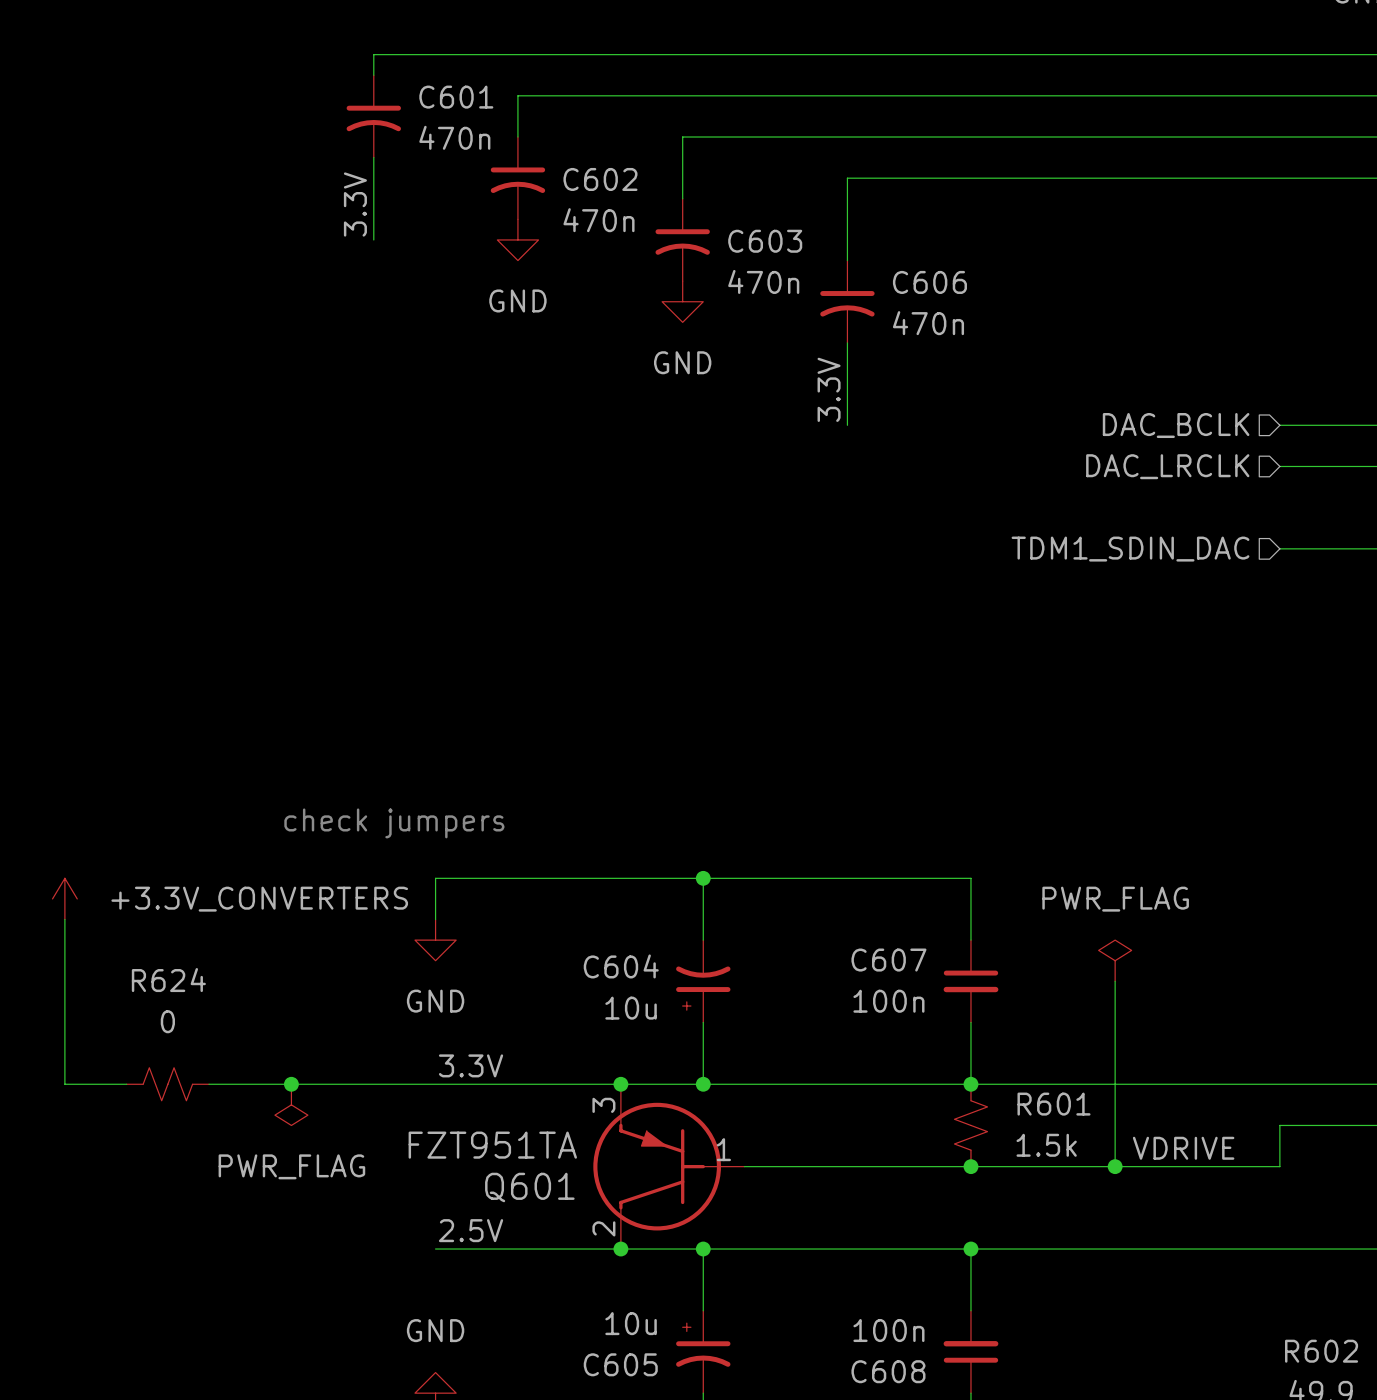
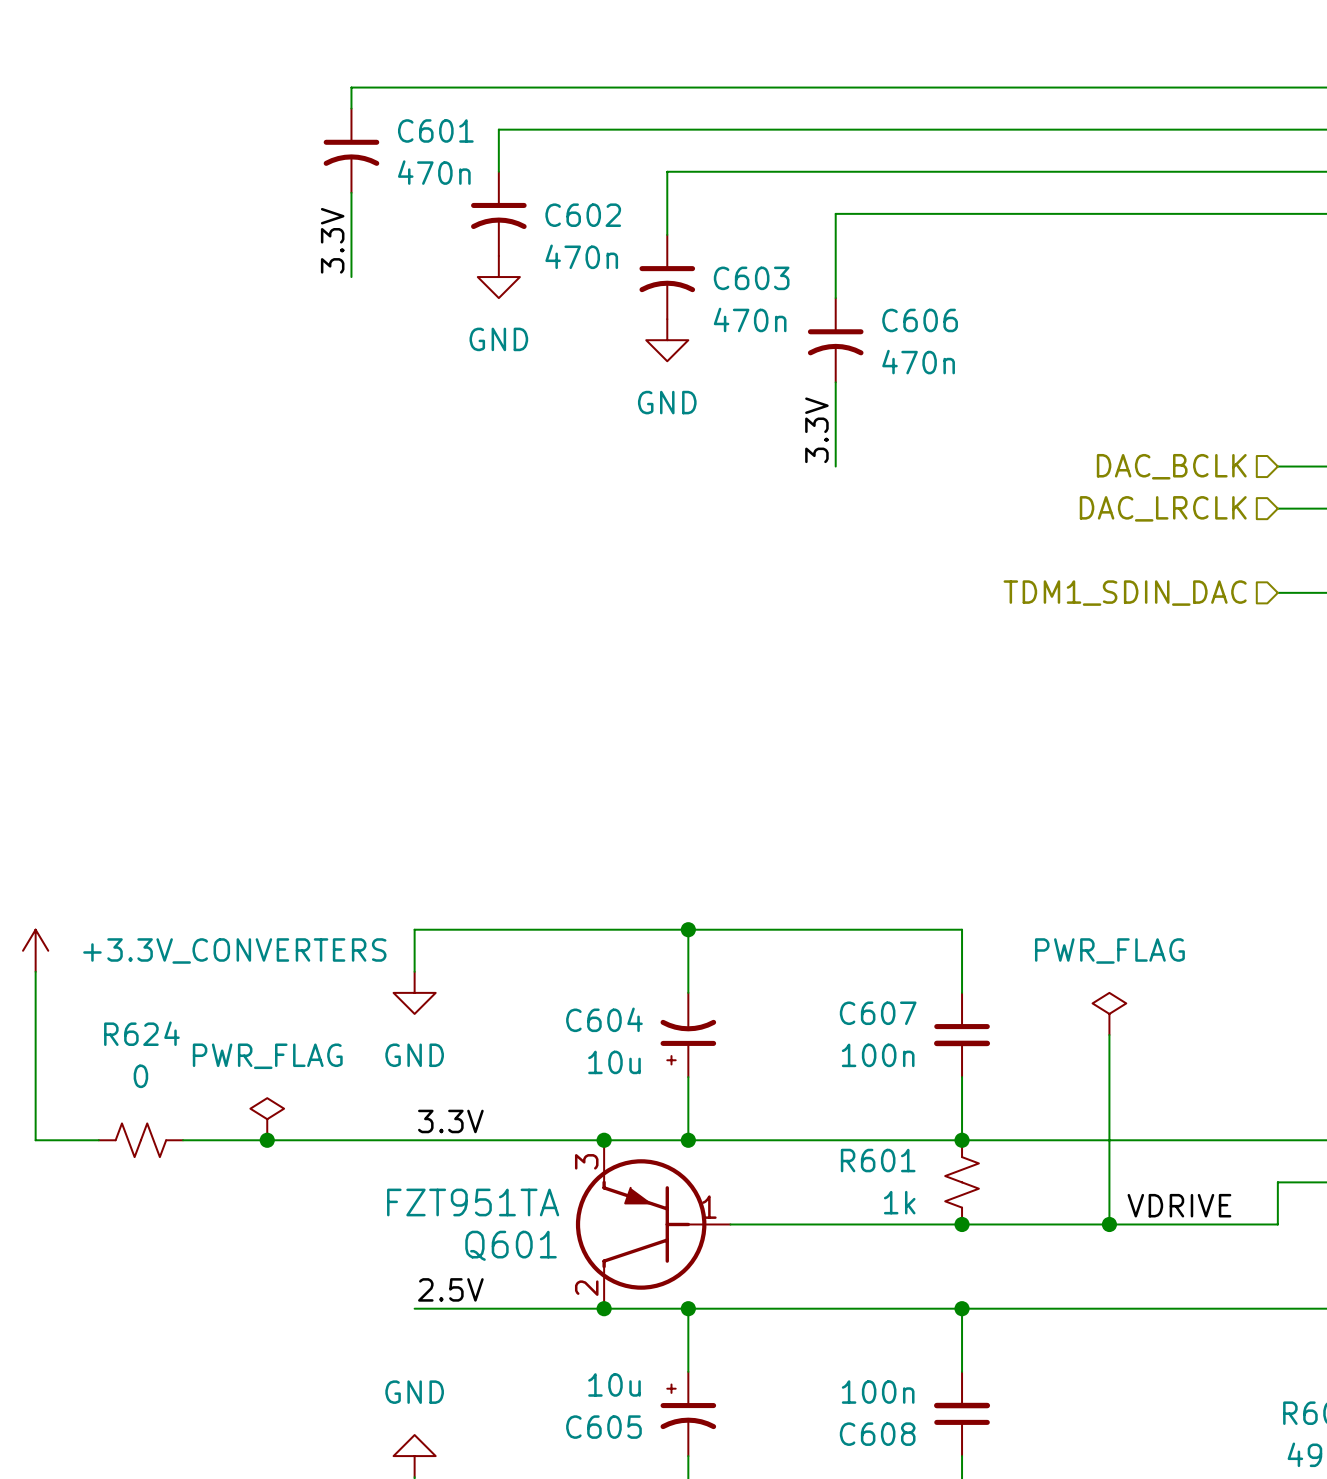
text: check jumpers (394, 823) -> none
power symbol rotation: 0° (291, 1104) -> 180° (267, 1119)
power symbol position: PWR_FLAG (291, 1104) -> PWR_FLAG (267, 1119)
R601 name position: R601 (1054, 1104) -> R601 (878, 1160)
R601 value: 1.5k (1046, 1145) -> 1k (899, 1202)

